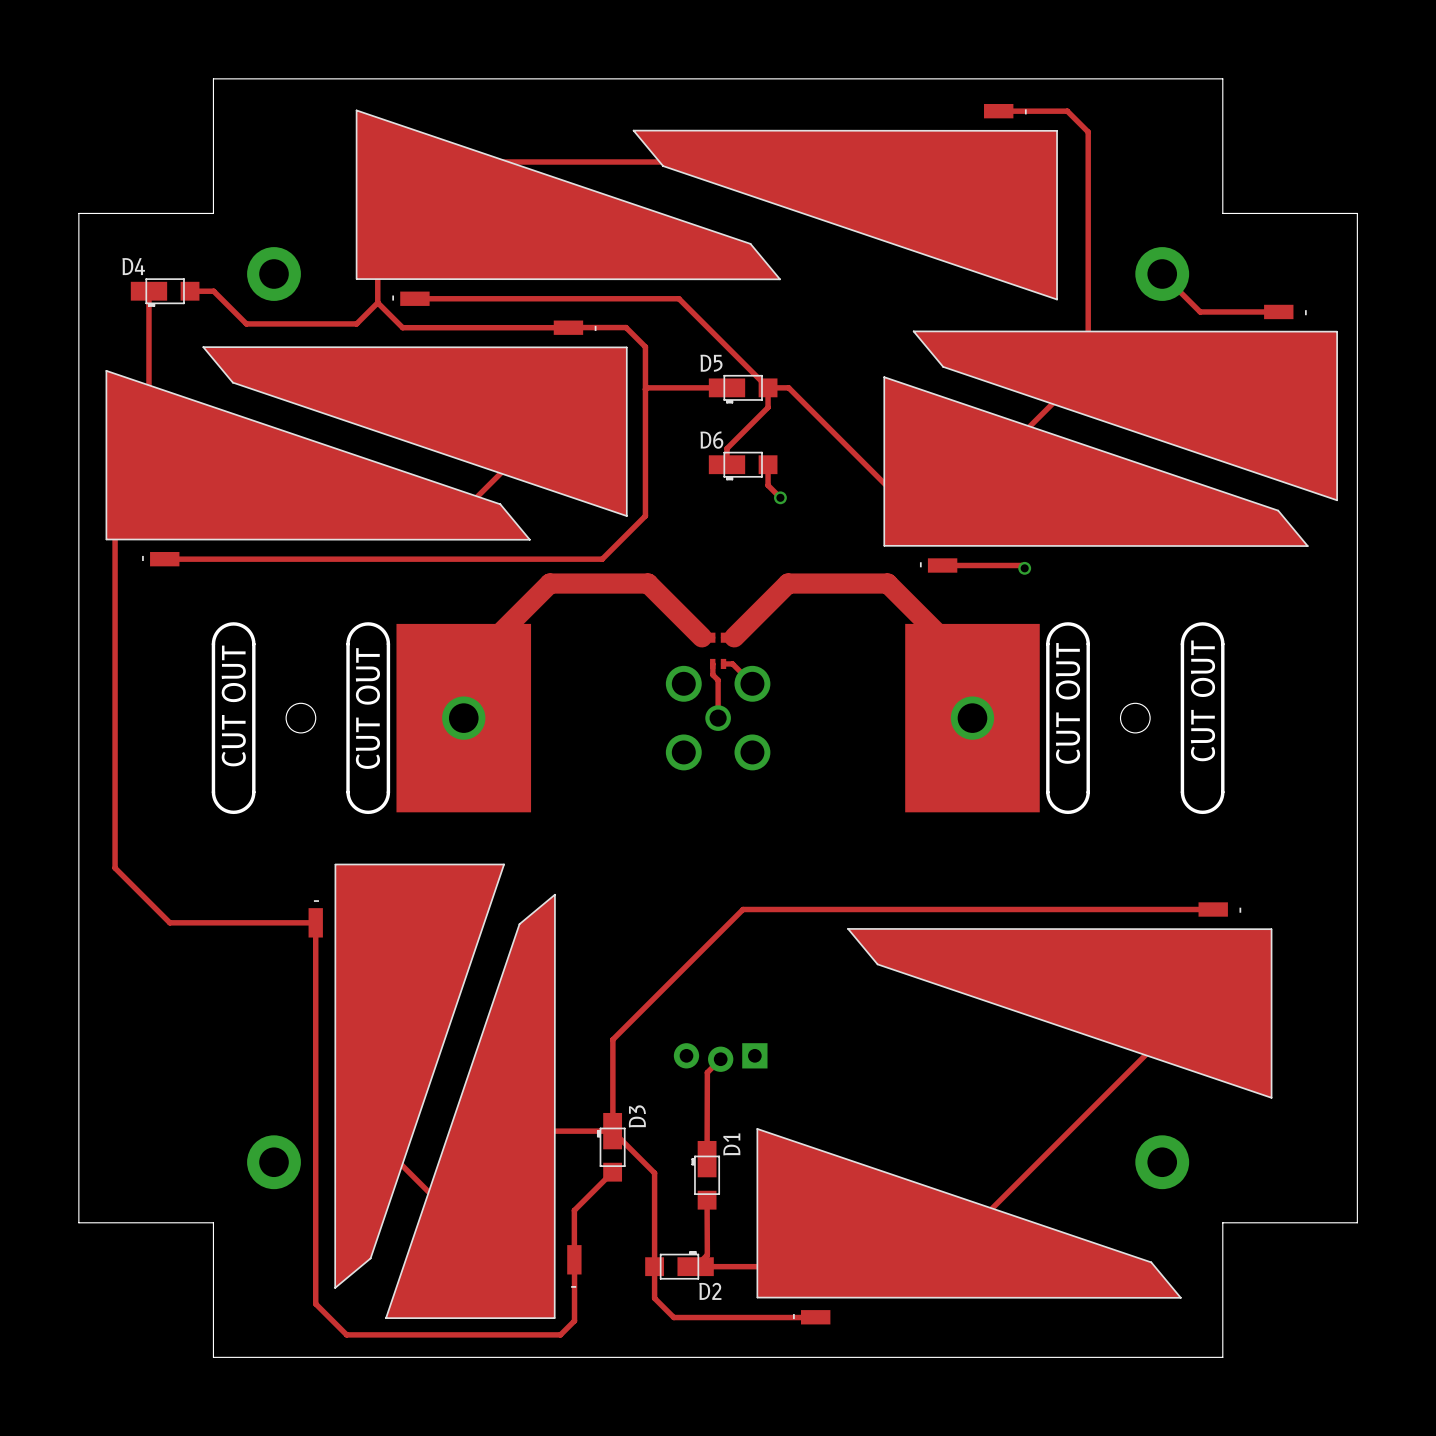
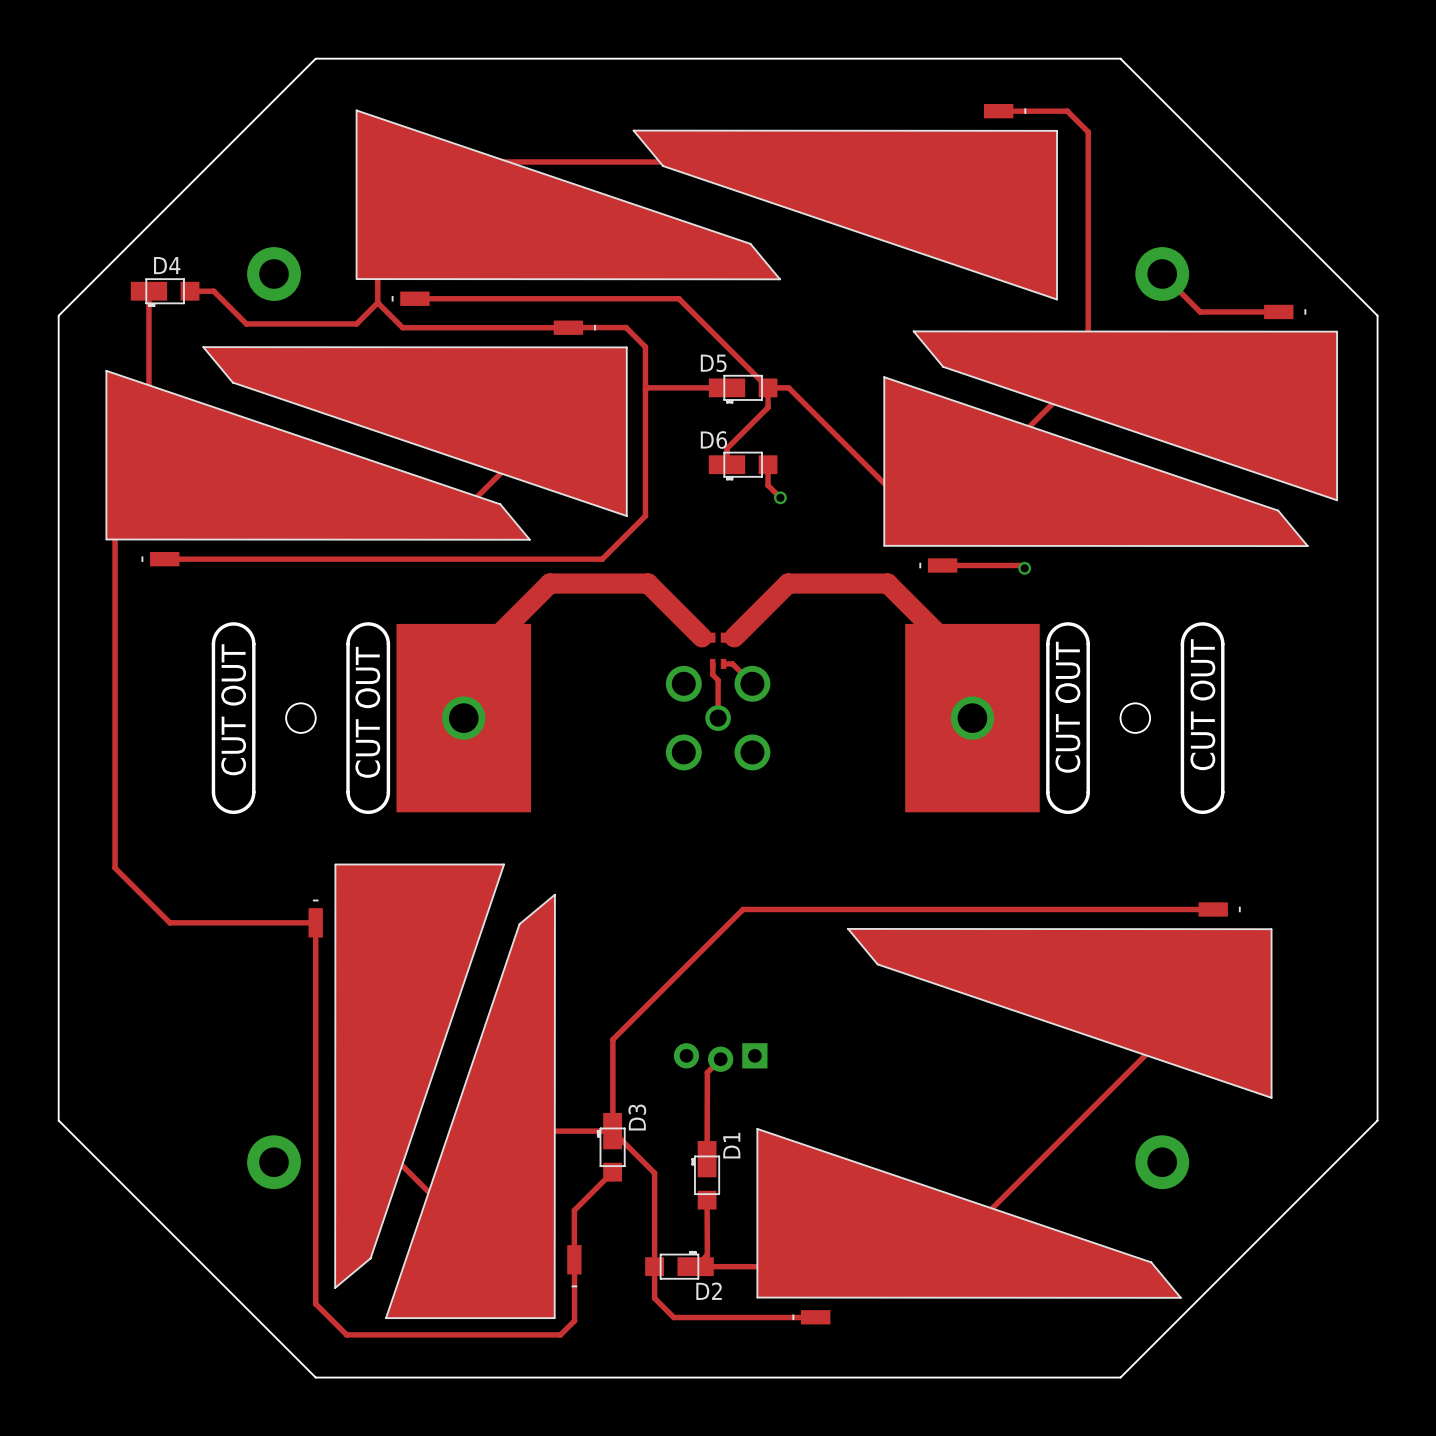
board edge: (213, 78) (213, 213) (78, 213) (78, 1222) (213, 1222) (213, 1357) (1222, 1357) (1222, 1222) (1357, 1222) (1357, 213) (1222, 213) (1222, 78) (213, 78) -> (315, 58) (58, 315) (58, 1120) (315, 1377) (1120, 1377) (1377, 1120) (1377, 315) (1120, 58) (315, 58)
D4 name position: D4 (133, 266) -> D4 (167, 265)

